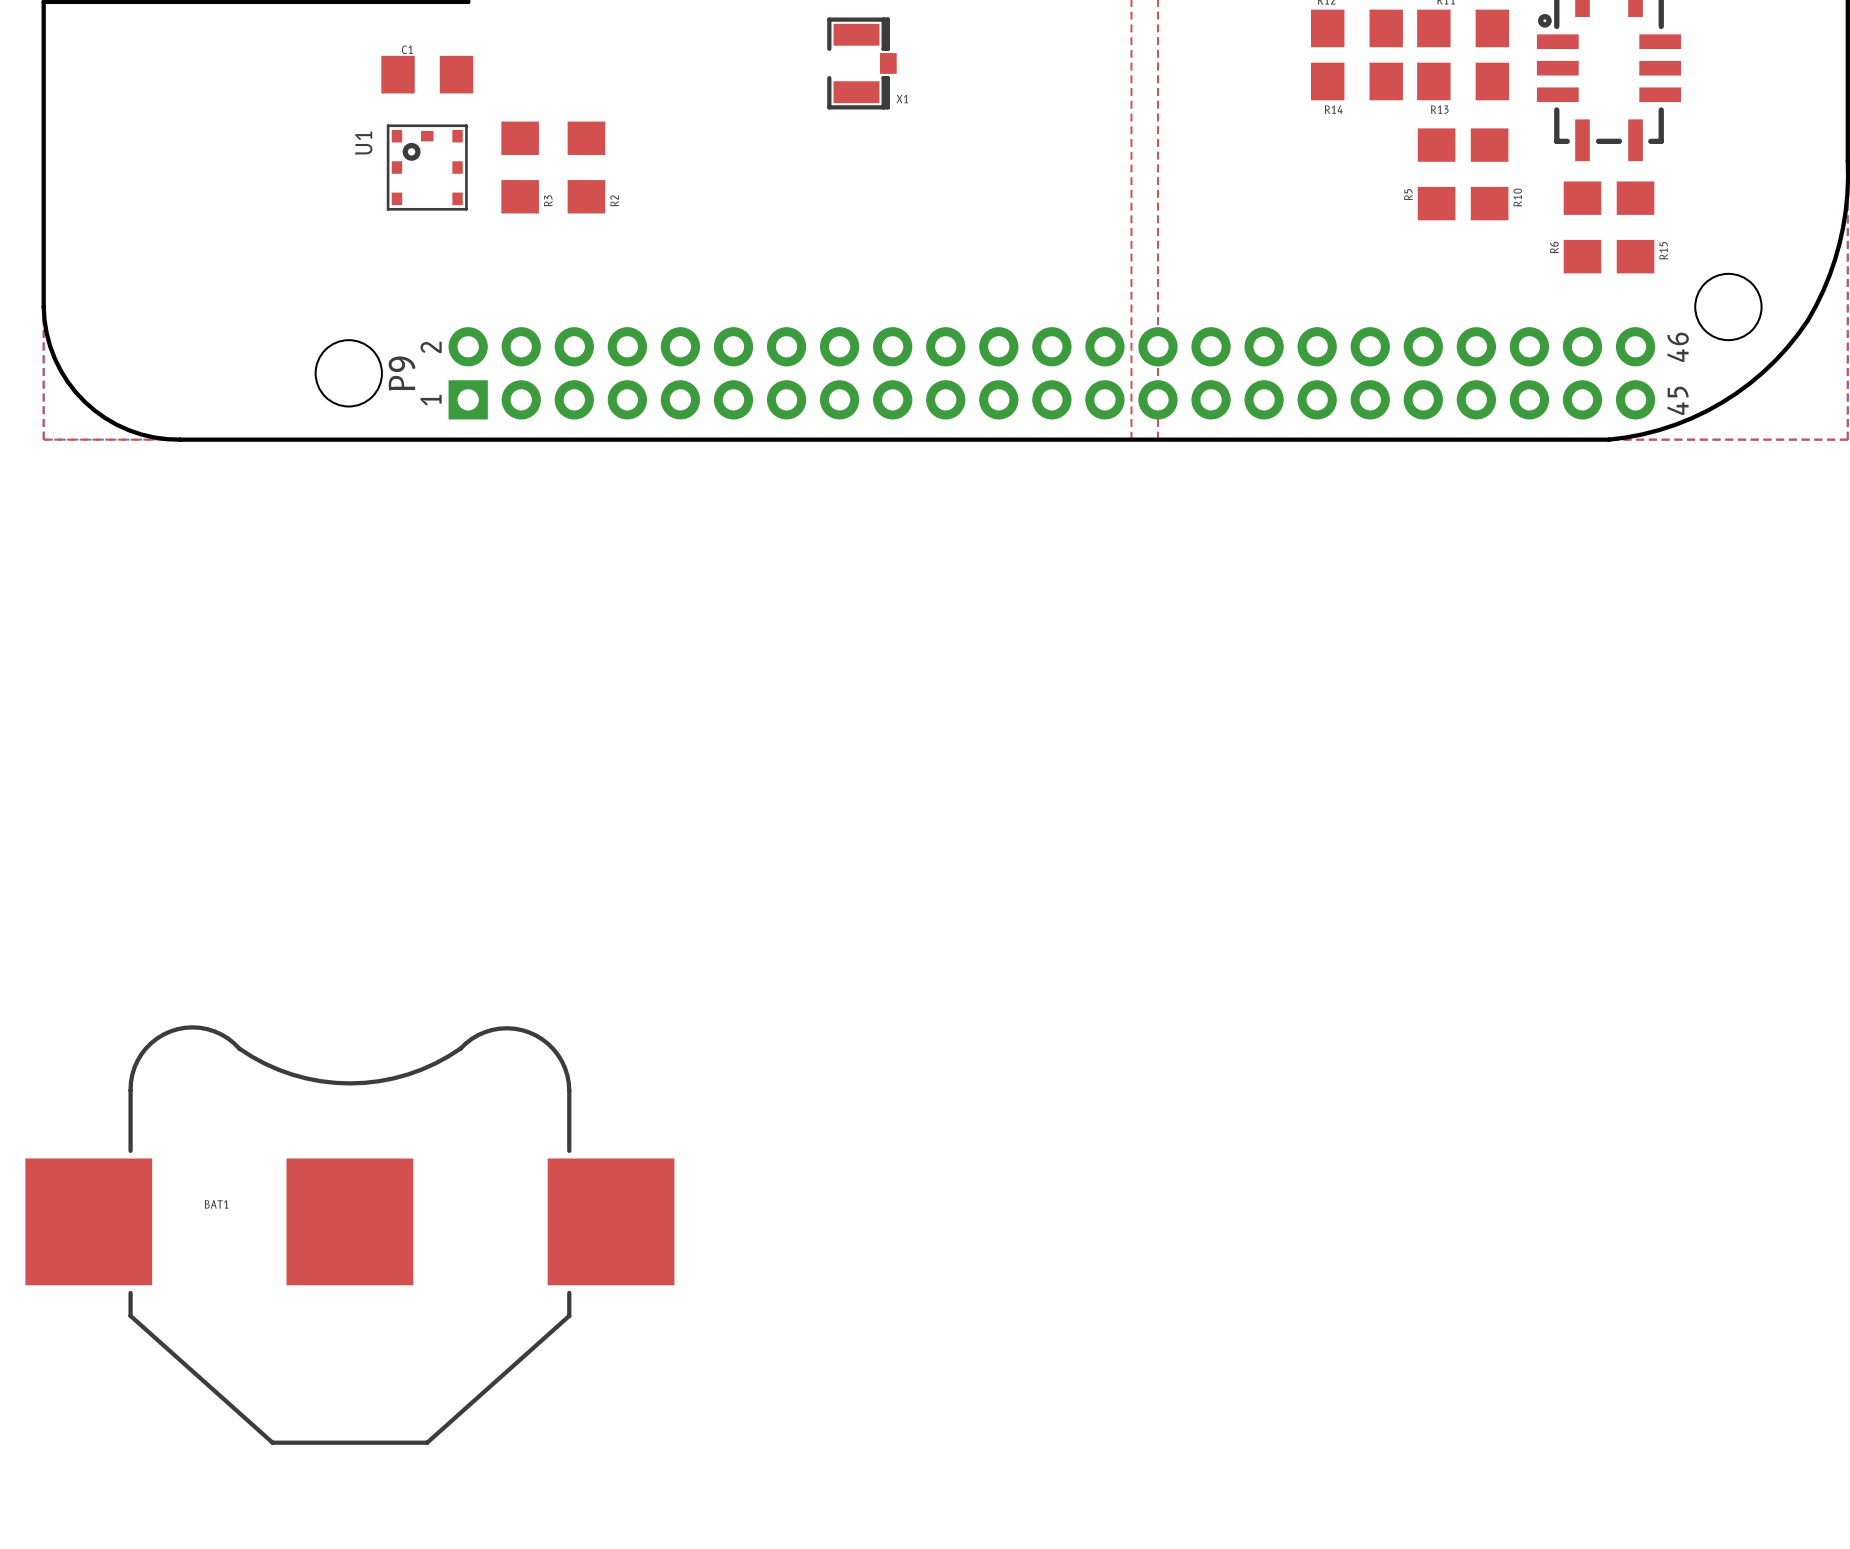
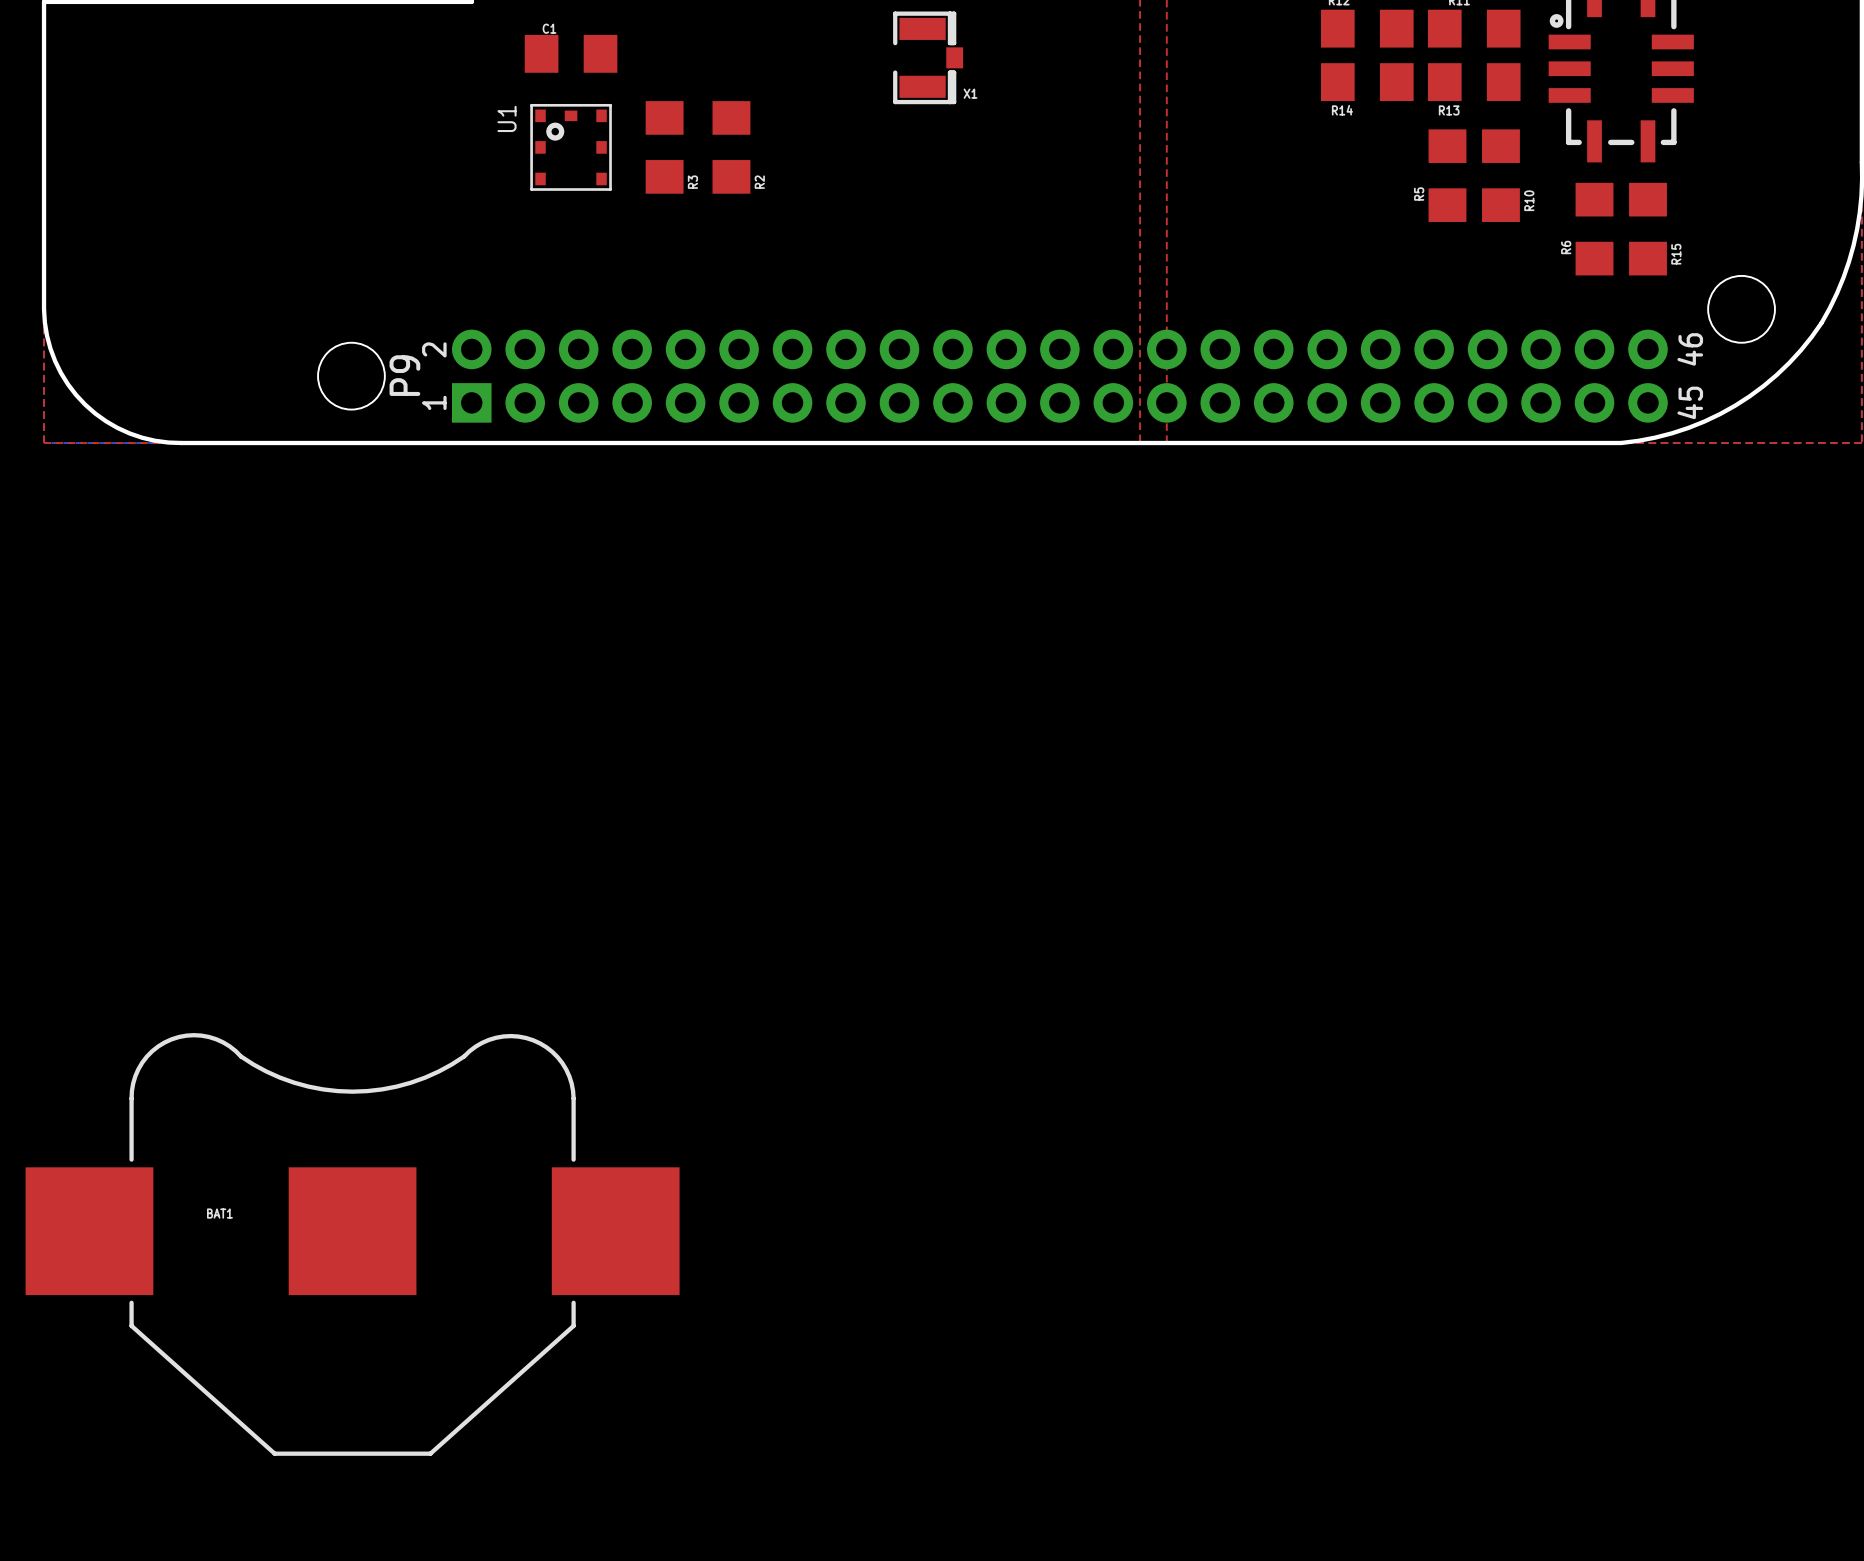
X1 position: (861, 63) -> (928, 57)
C1 position: (427, 74) -> (571, 53)
U1 position: (427, 167) -> (571, 147)
R3 position: (520, 167) -> (664, 147)
R2 position: (586, 167) -> (731, 147)

